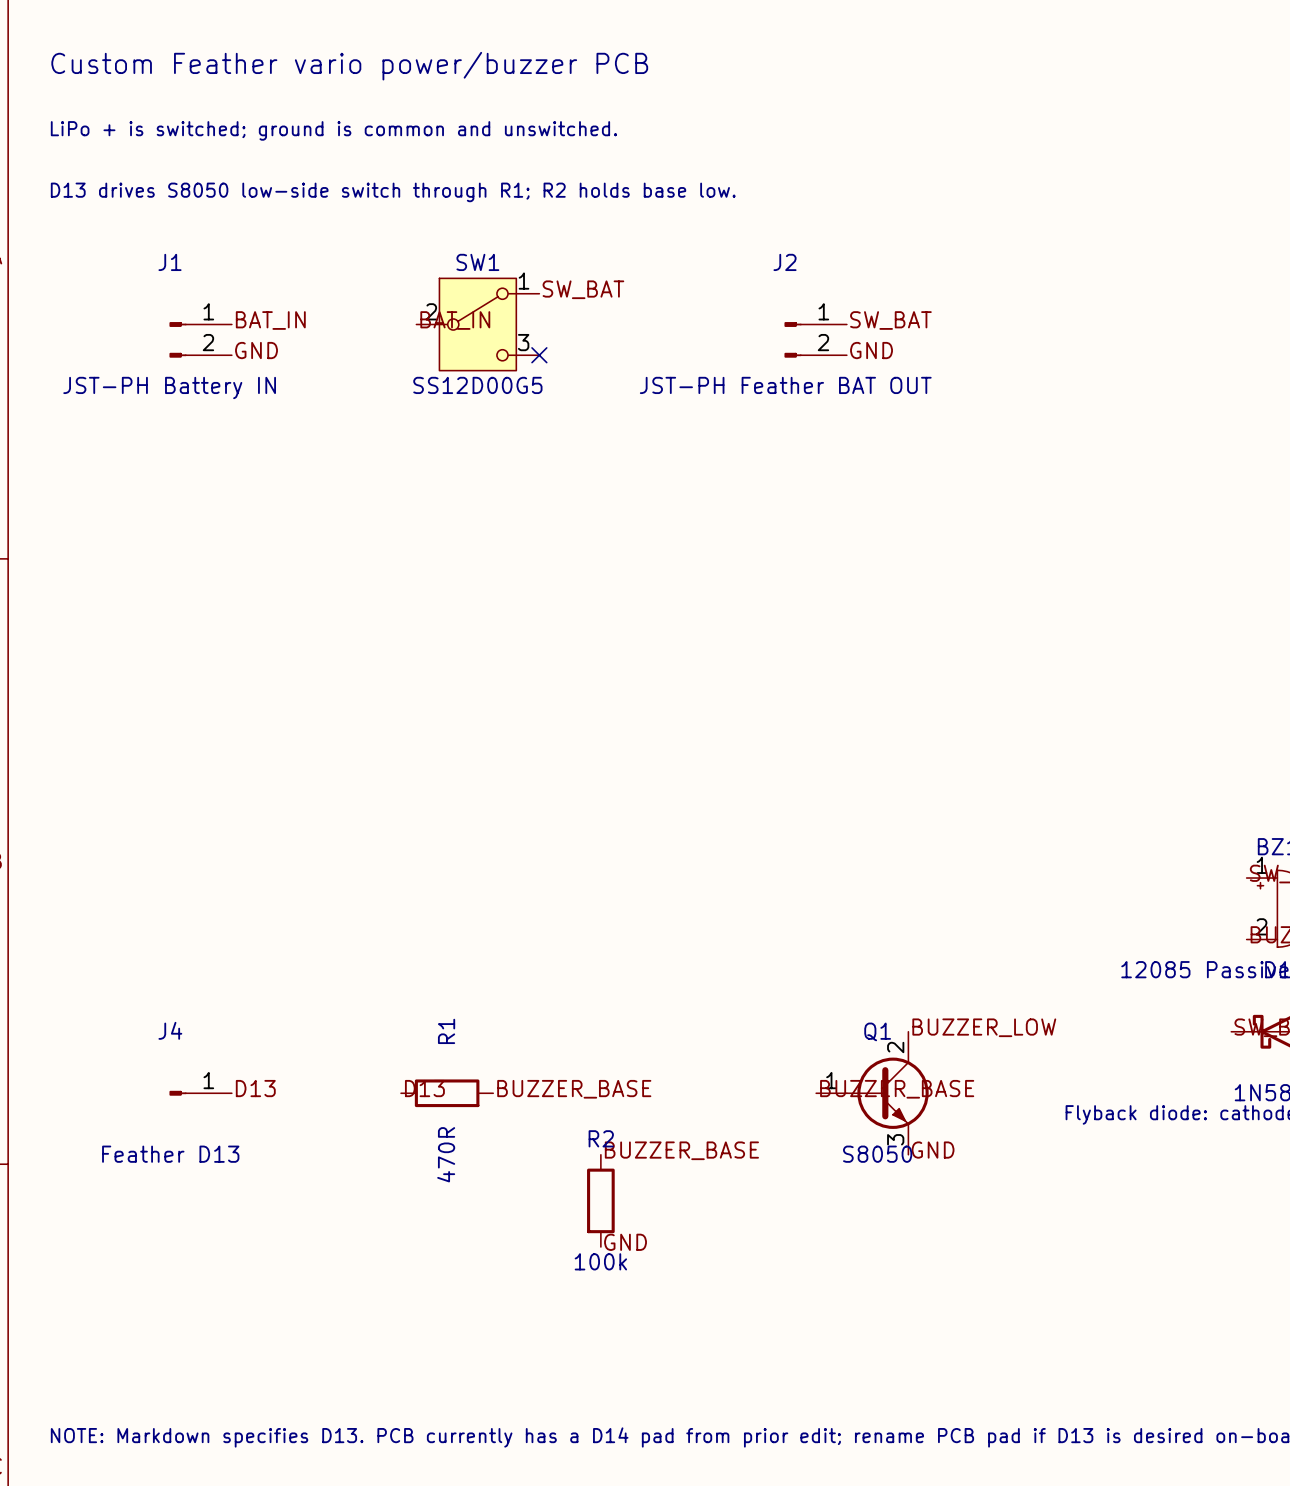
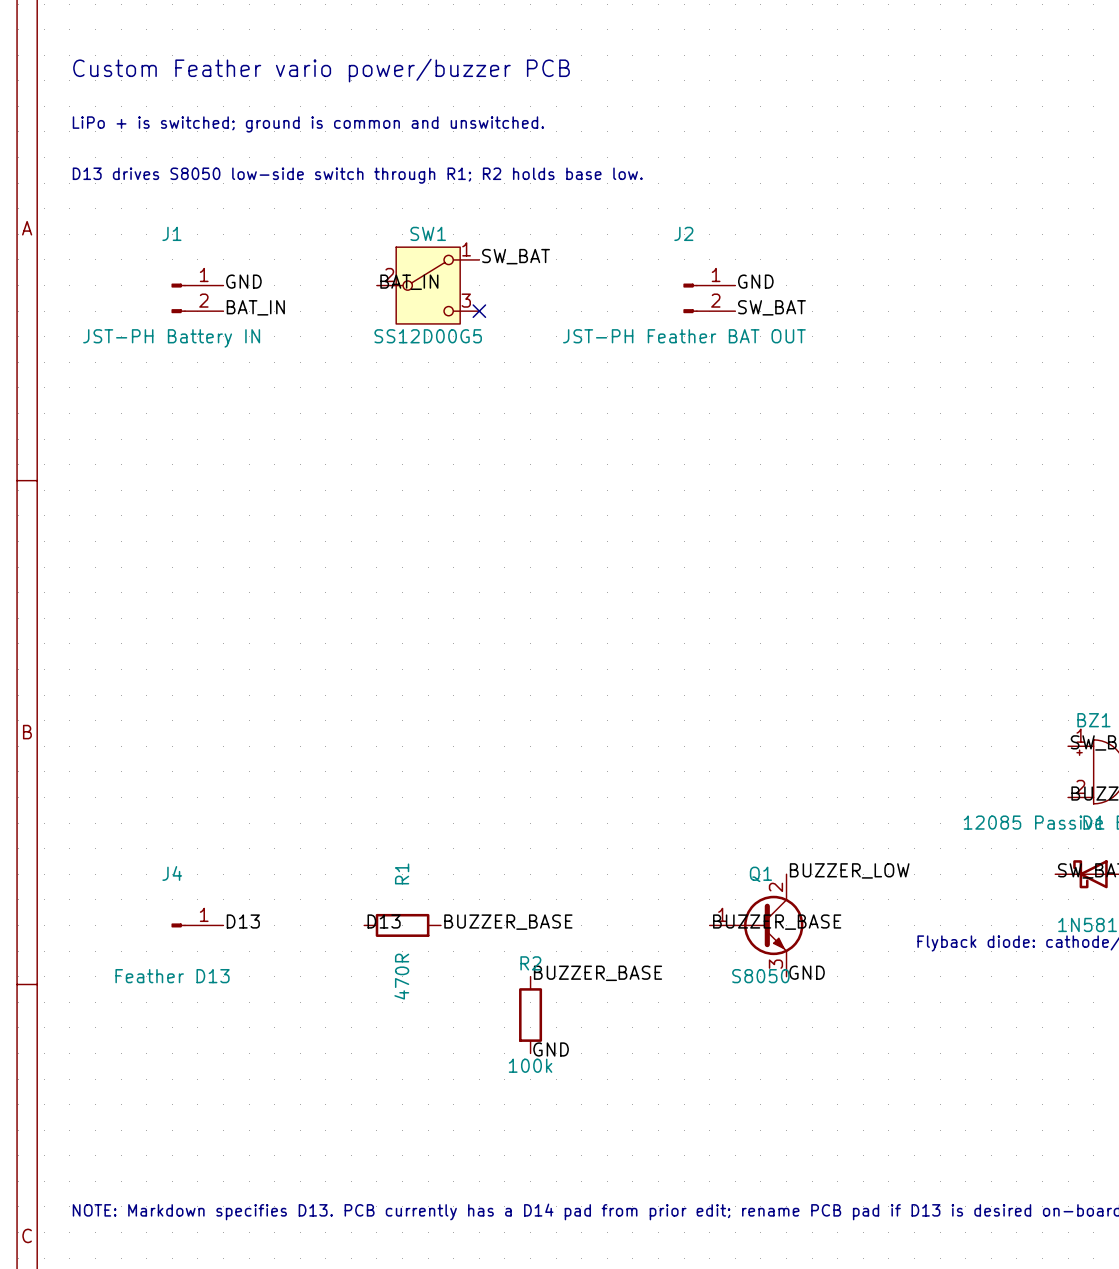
label: BAT_IN (270, 320) -> GND (243, 281)
label: SW_BAT (890, 320) -> GND (755, 281)
label: GND (256, 350) -> BAT_IN (255, 307)
label: GND (871, 350) -> SW_BAT (771, 307)

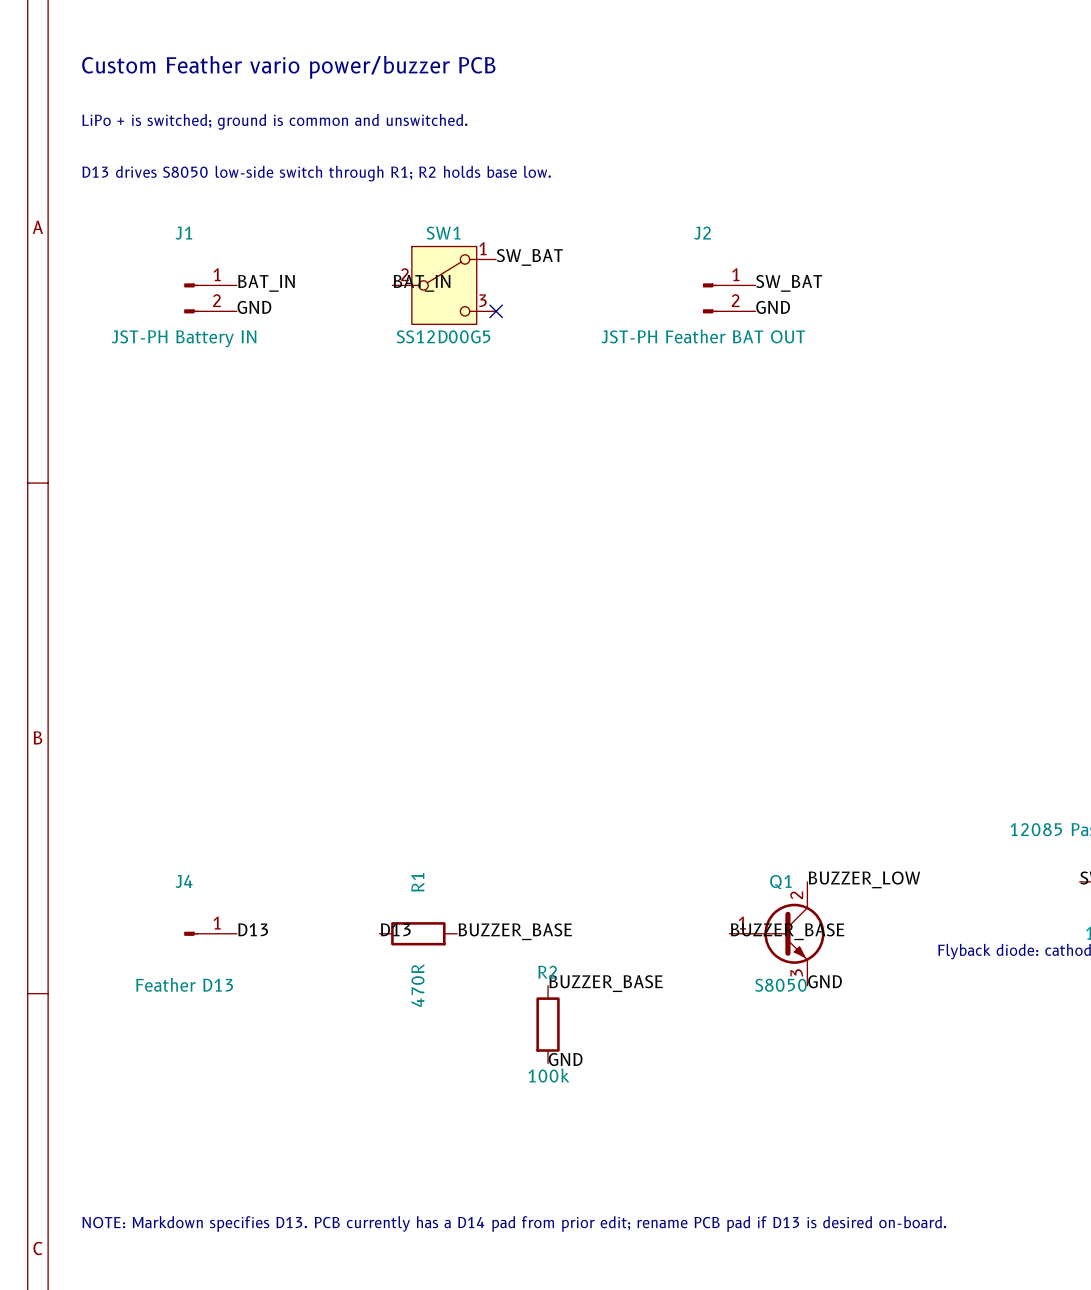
label: GND (243, 281) -> BAT_IN (266, 283)
label: GND (755, 281) -> SW_BAT (789, 283)
label: BAT_IN (255, 307) -> GND (254, 307)
label: SW_BAT (771, 307) -> GND (773, 307)

